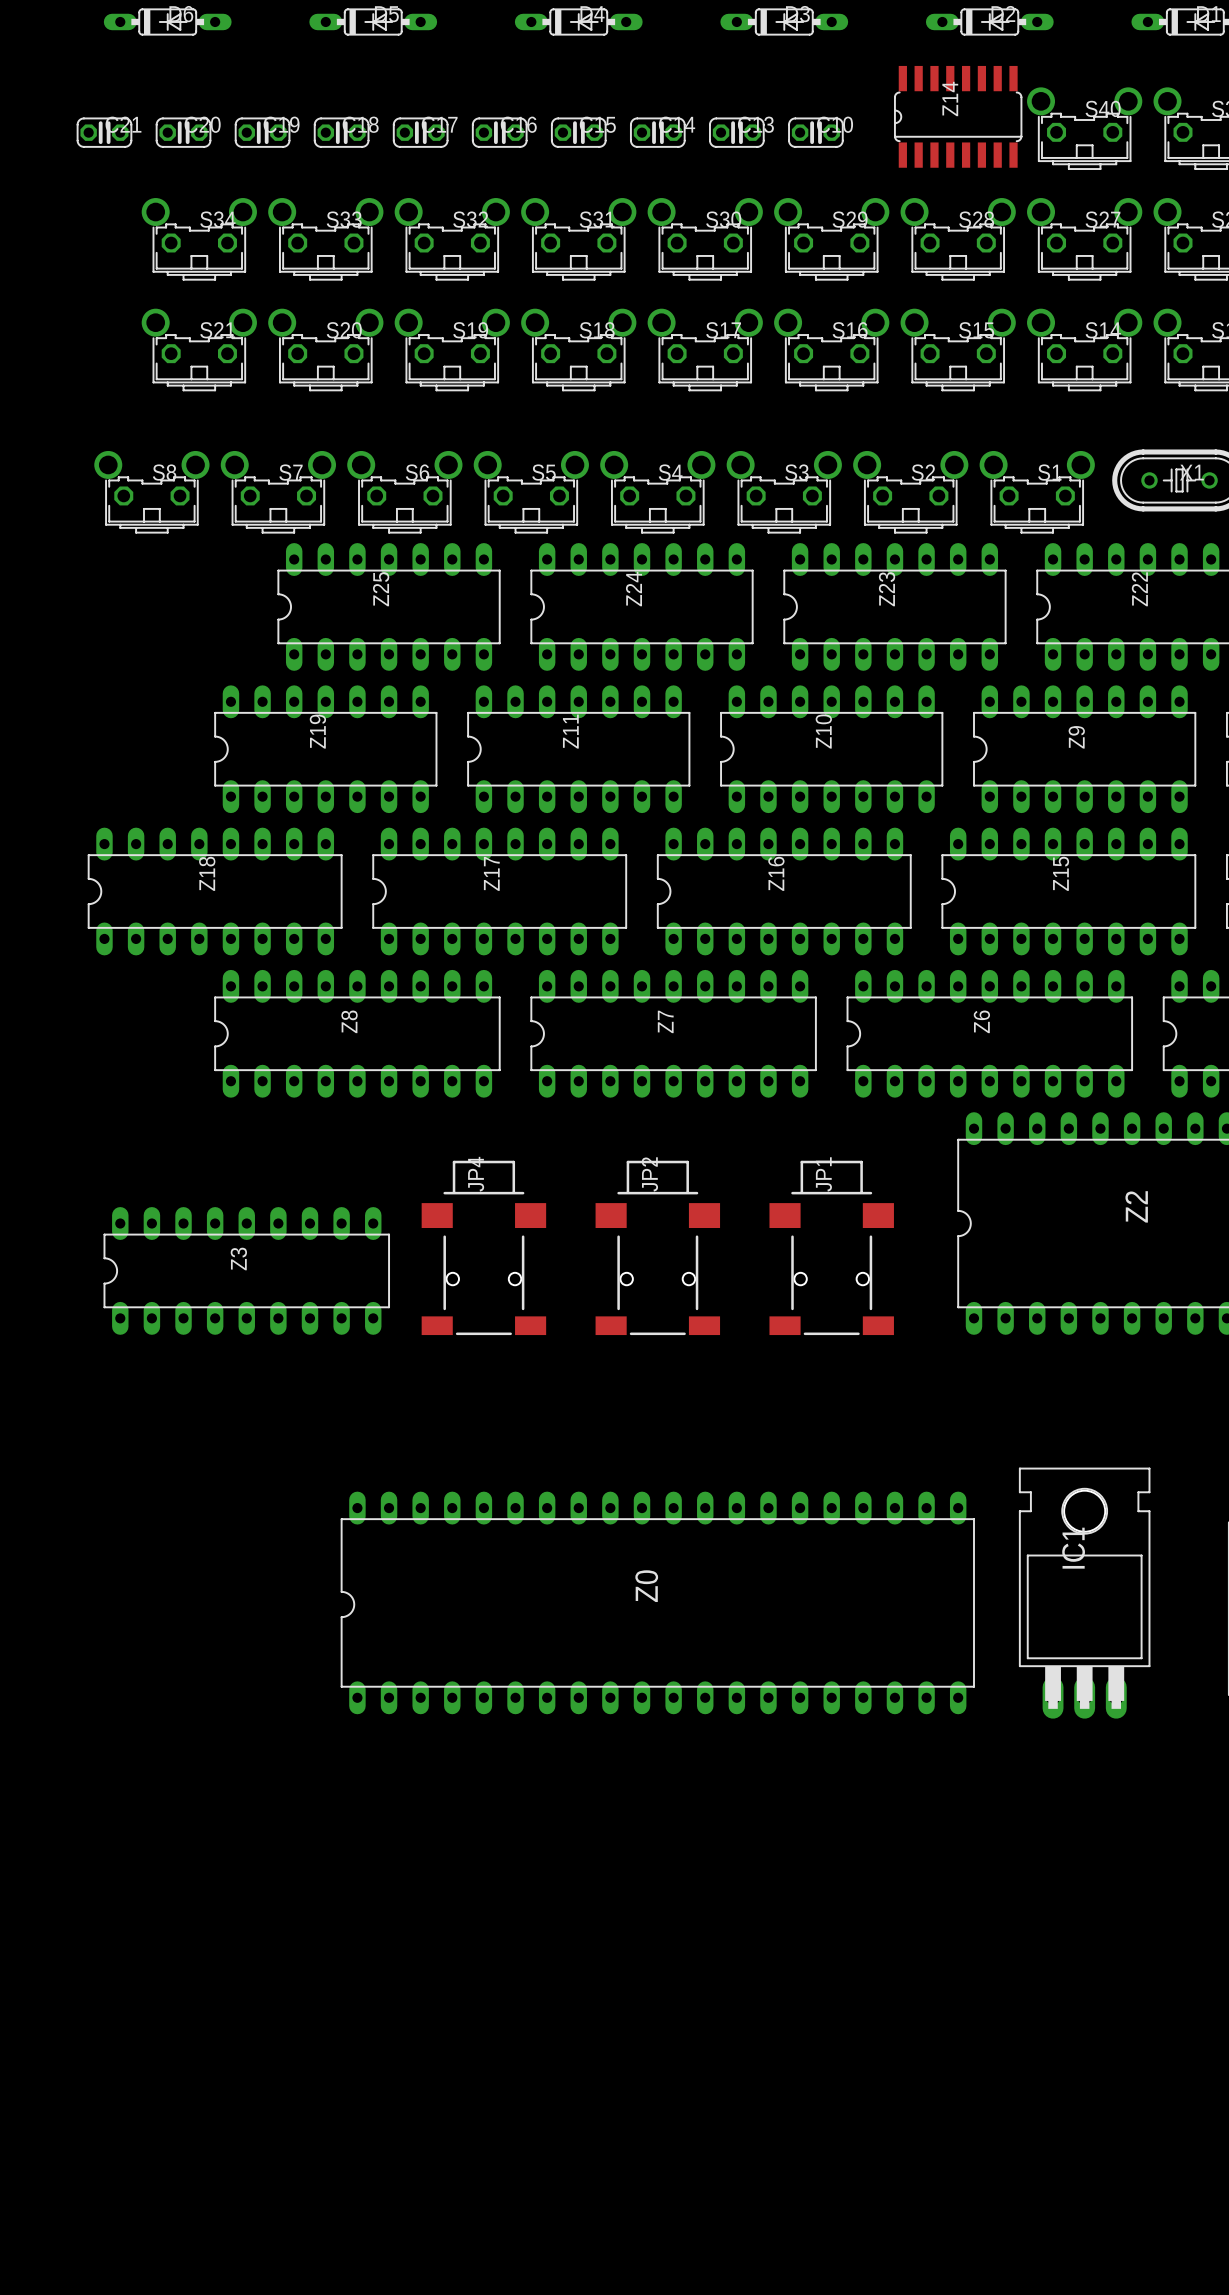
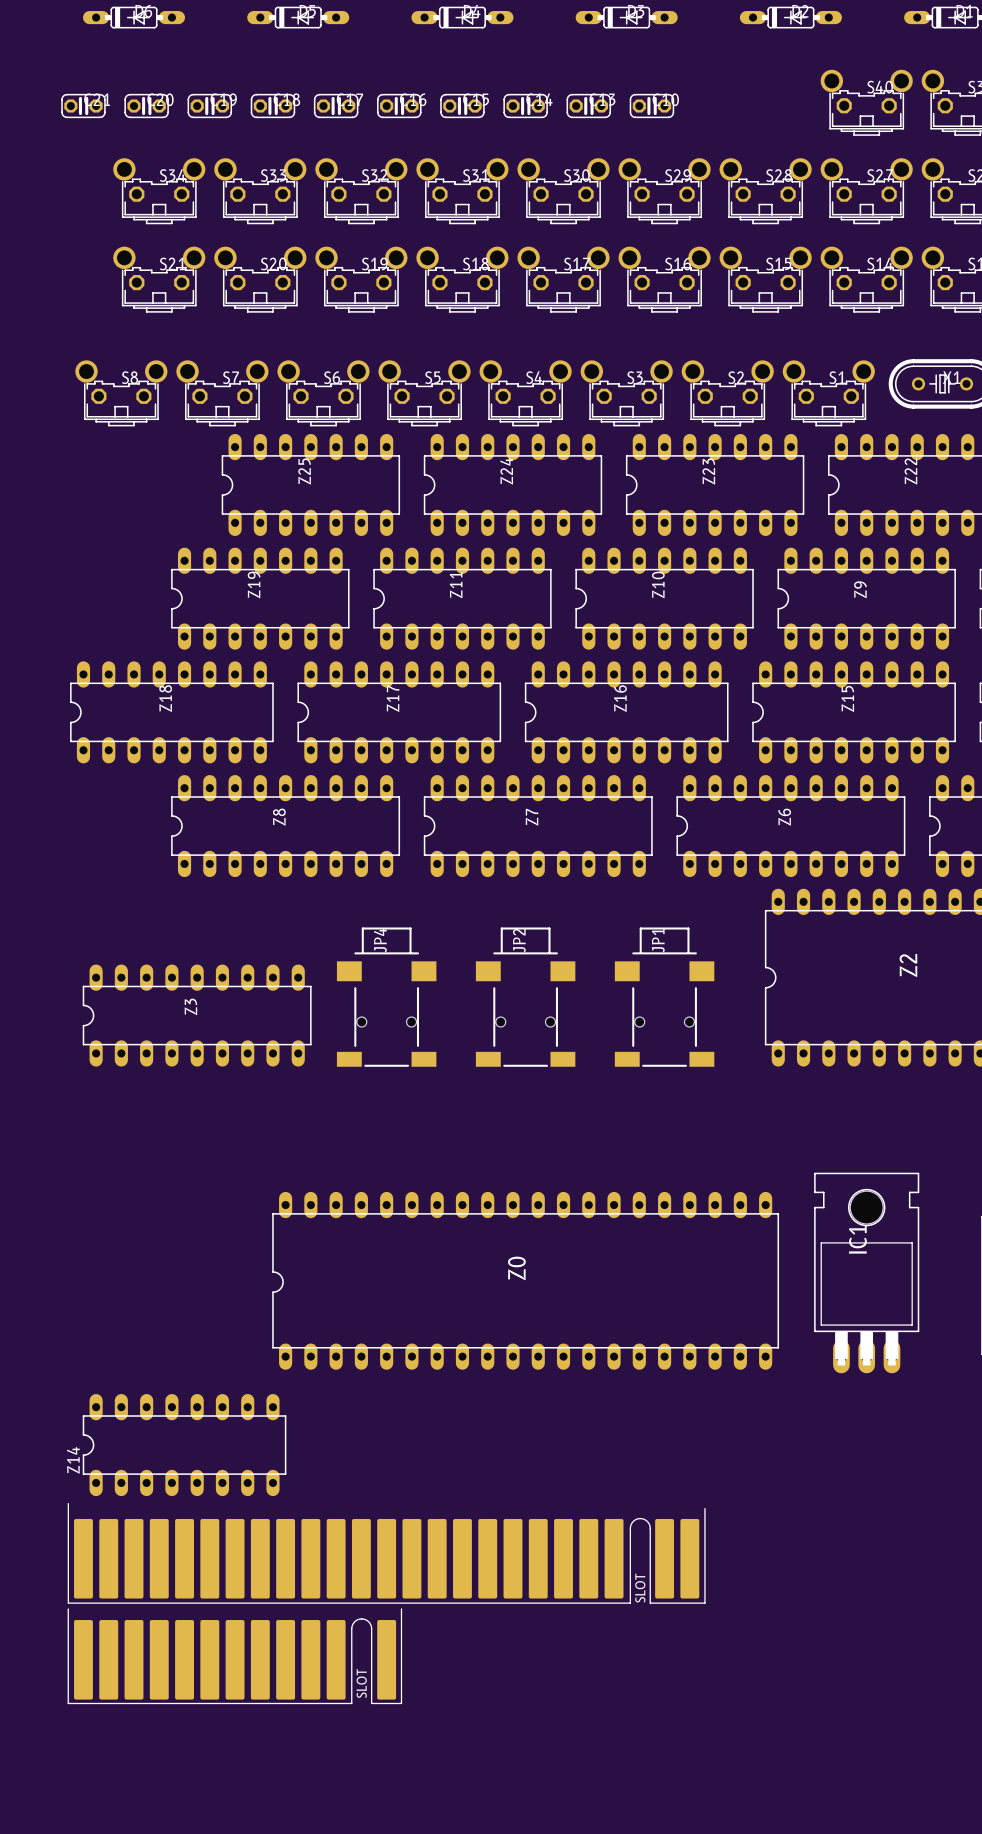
Z14 footprint: [894, 65, 1023, 168] -> [82, 1394, 287, 1497]
Z14 name position: Z14 (950, 99) -> Z14 (73, 1460)
part: none -> (386, 1553)
part: none -> (234, 1656)

